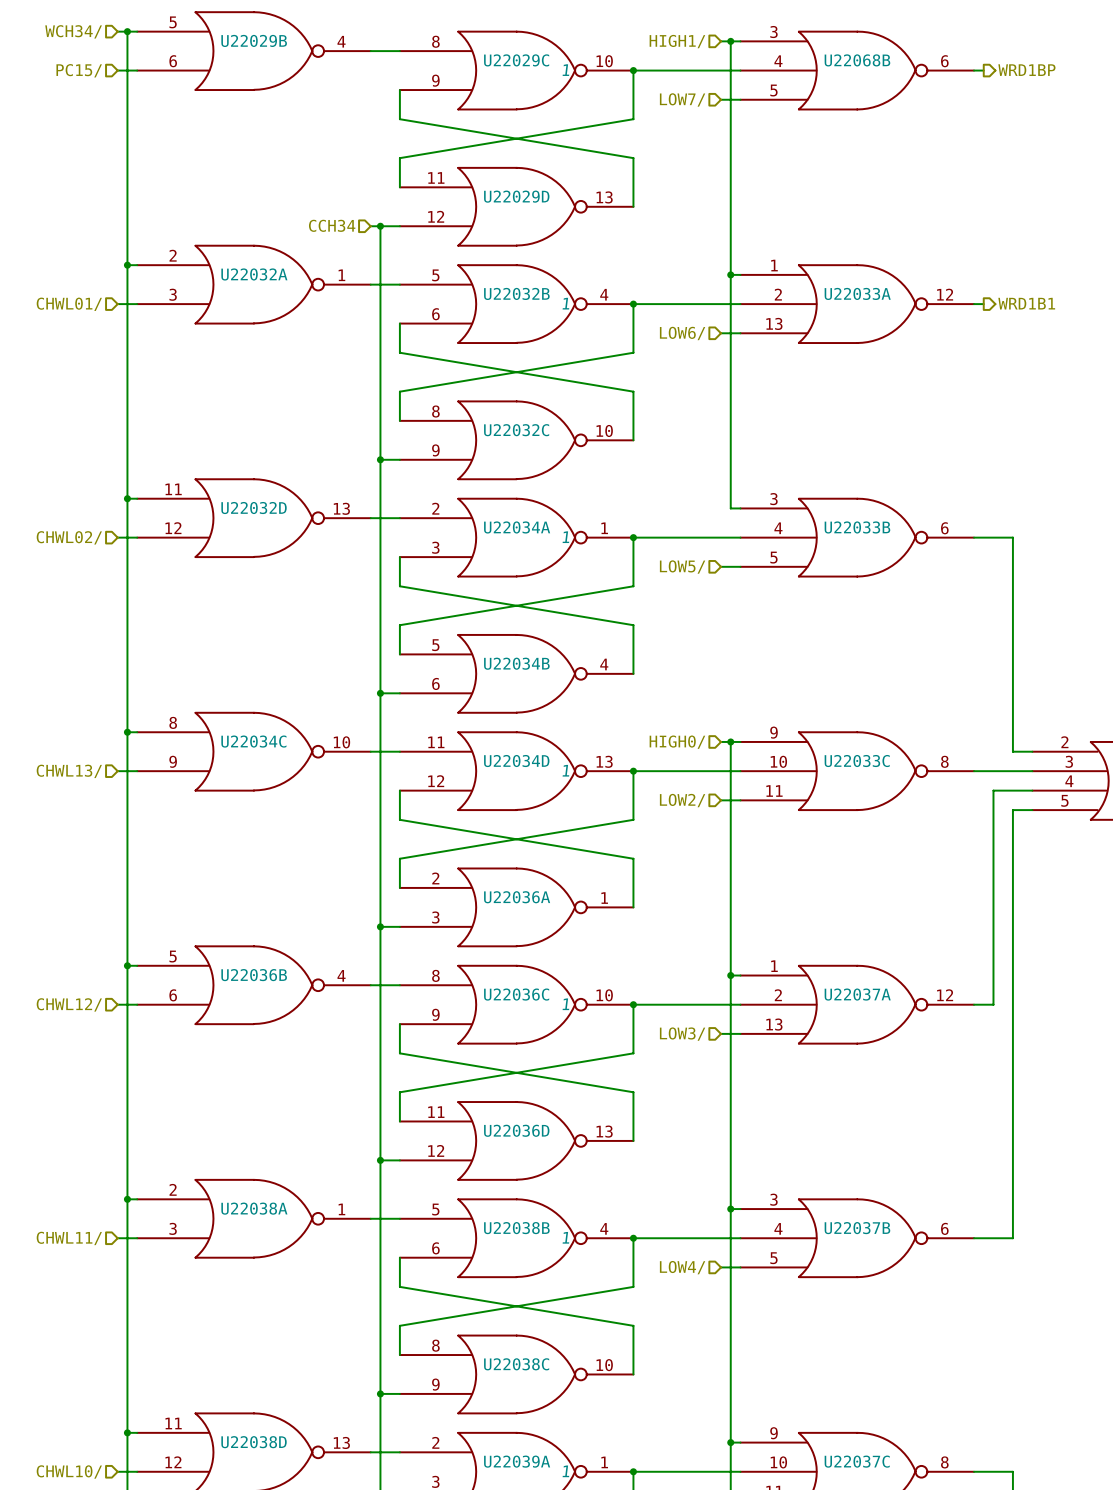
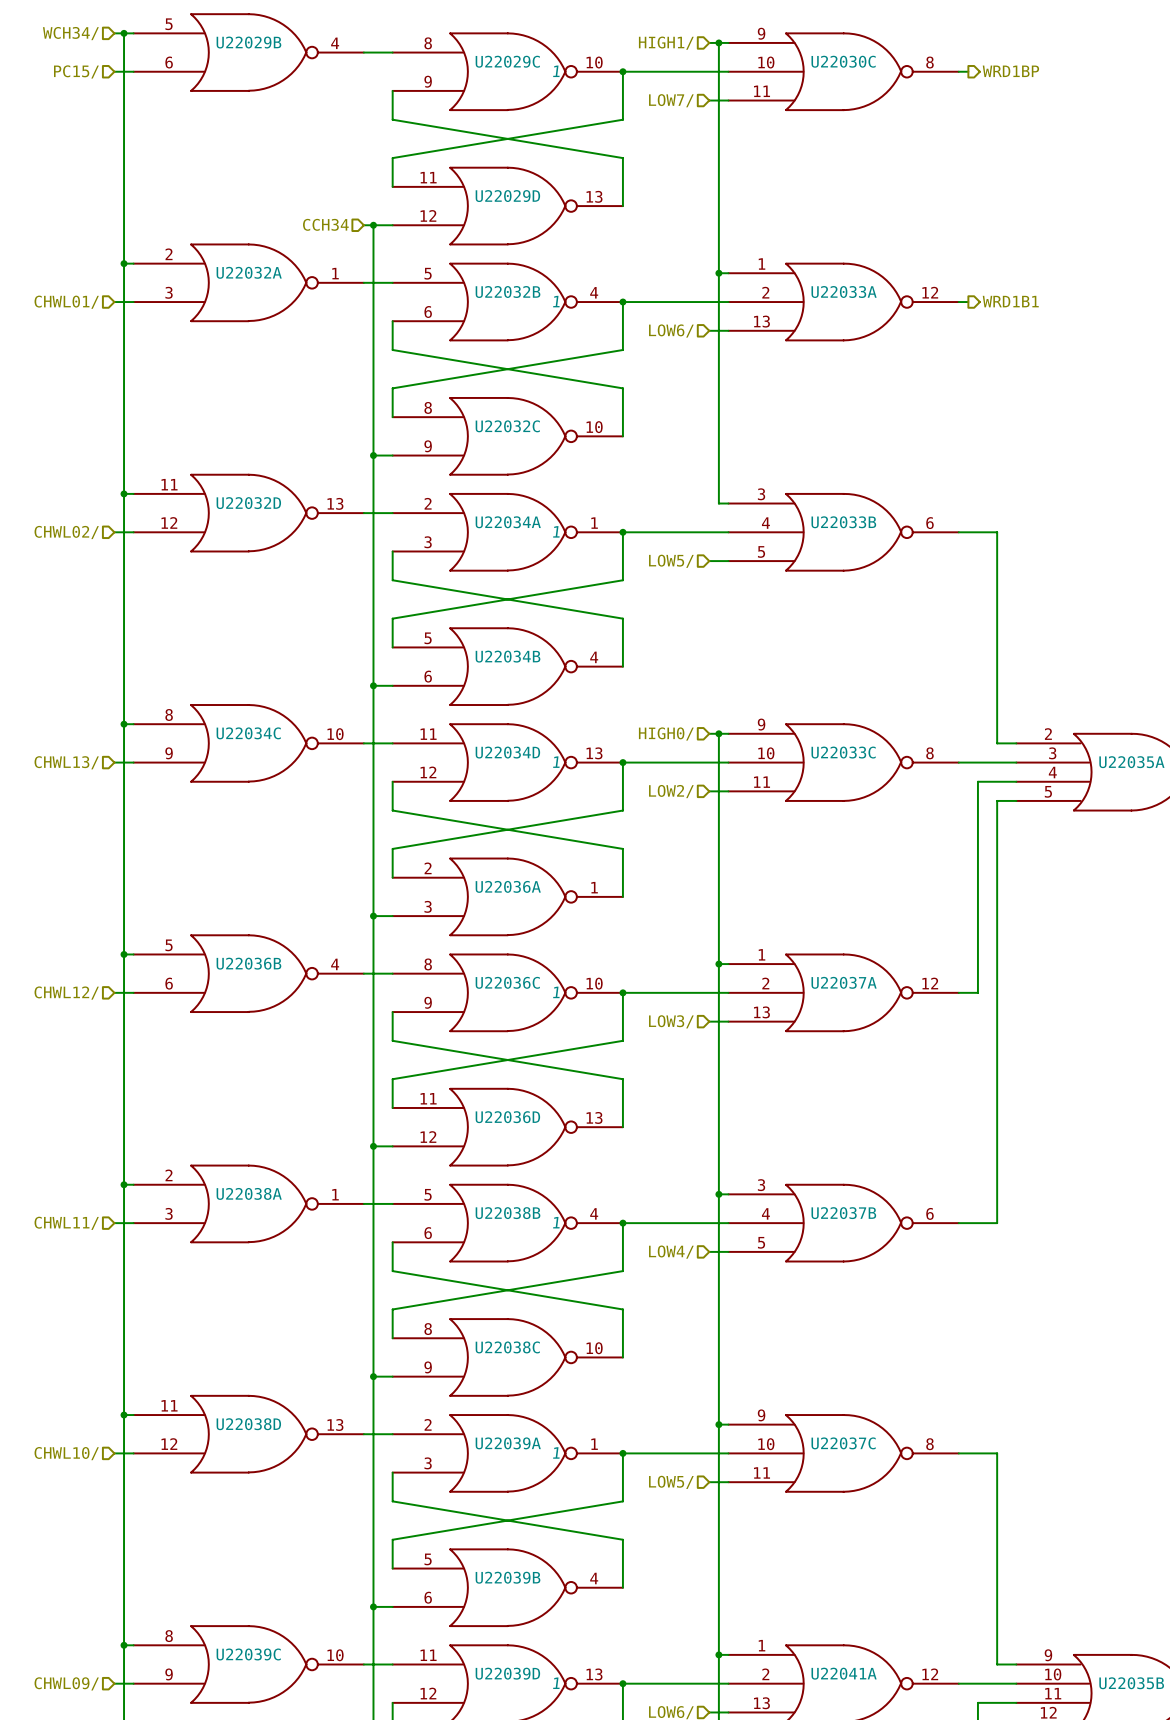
U22068B pin number: 3 (773, 32) -> 9 (761, 33)
U22068B name: U22068B (857, 60) -> U22030C (843, 61)
U22068B pin number: 4 (778, 61) -> 10 (766, 62)
U22068B pin number: 6 (944, 61) -> 8 (929, 62)
U22068B pin number: 5 (773, 90) -> 11 (762, 91)

